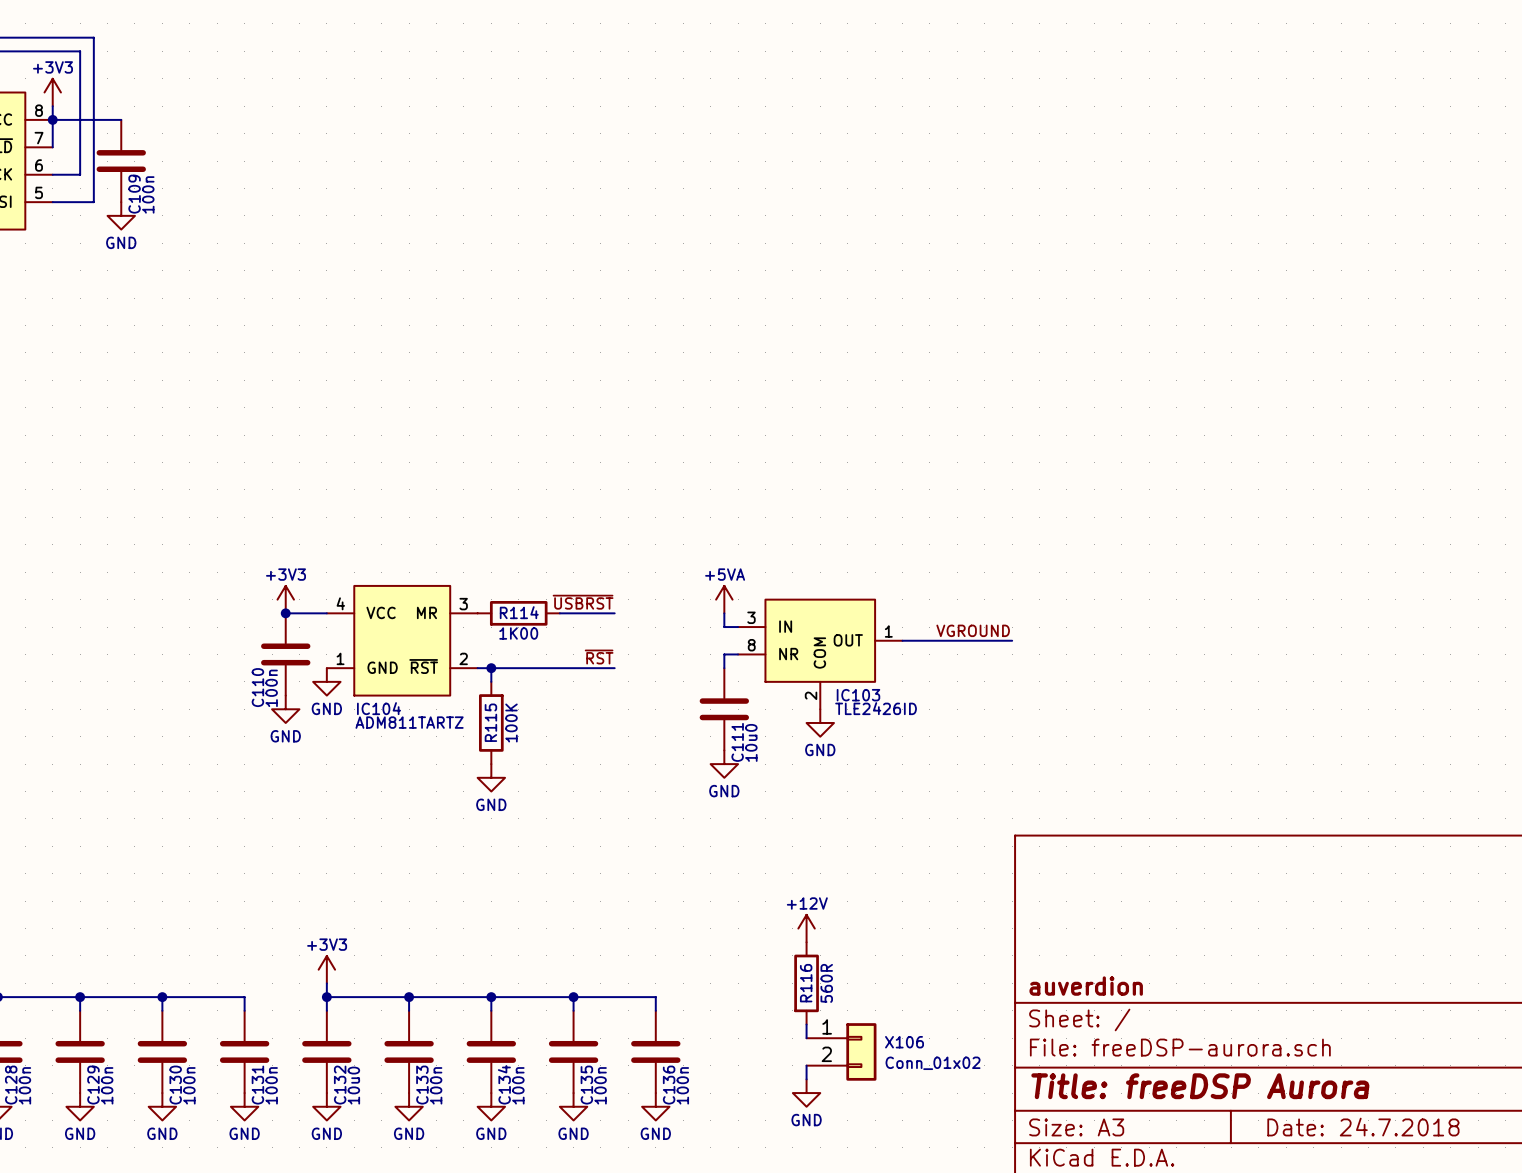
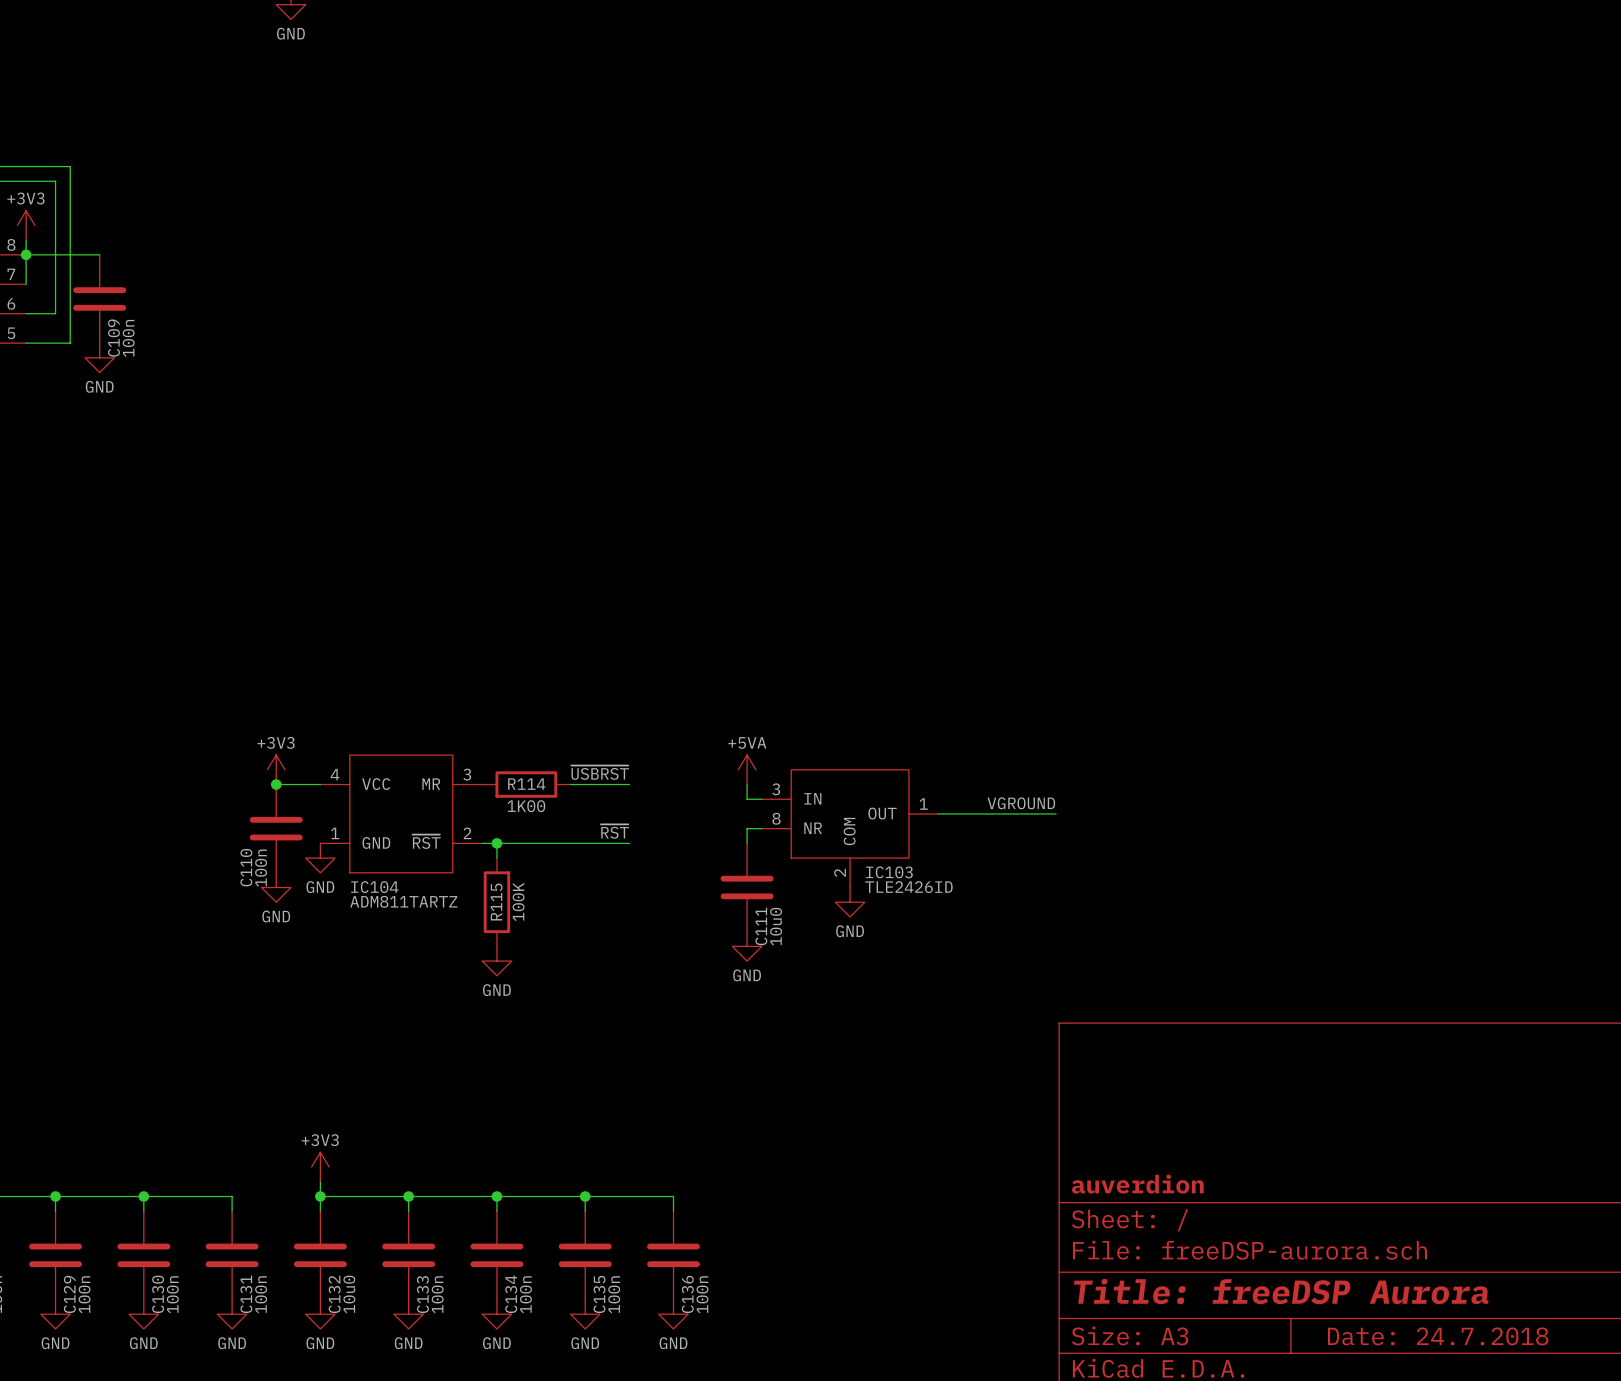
power symbol: +12V (806, 928) -> none
R116: 560R (806, 983) -> none
wire: (806, 1024) (806, 1038) -> none
X106: Conn_01x02 (841, 1051) -> none
wire: (806, 1065) (806, 1079) -> none
power symbol: GND (806, 1093) -> none

